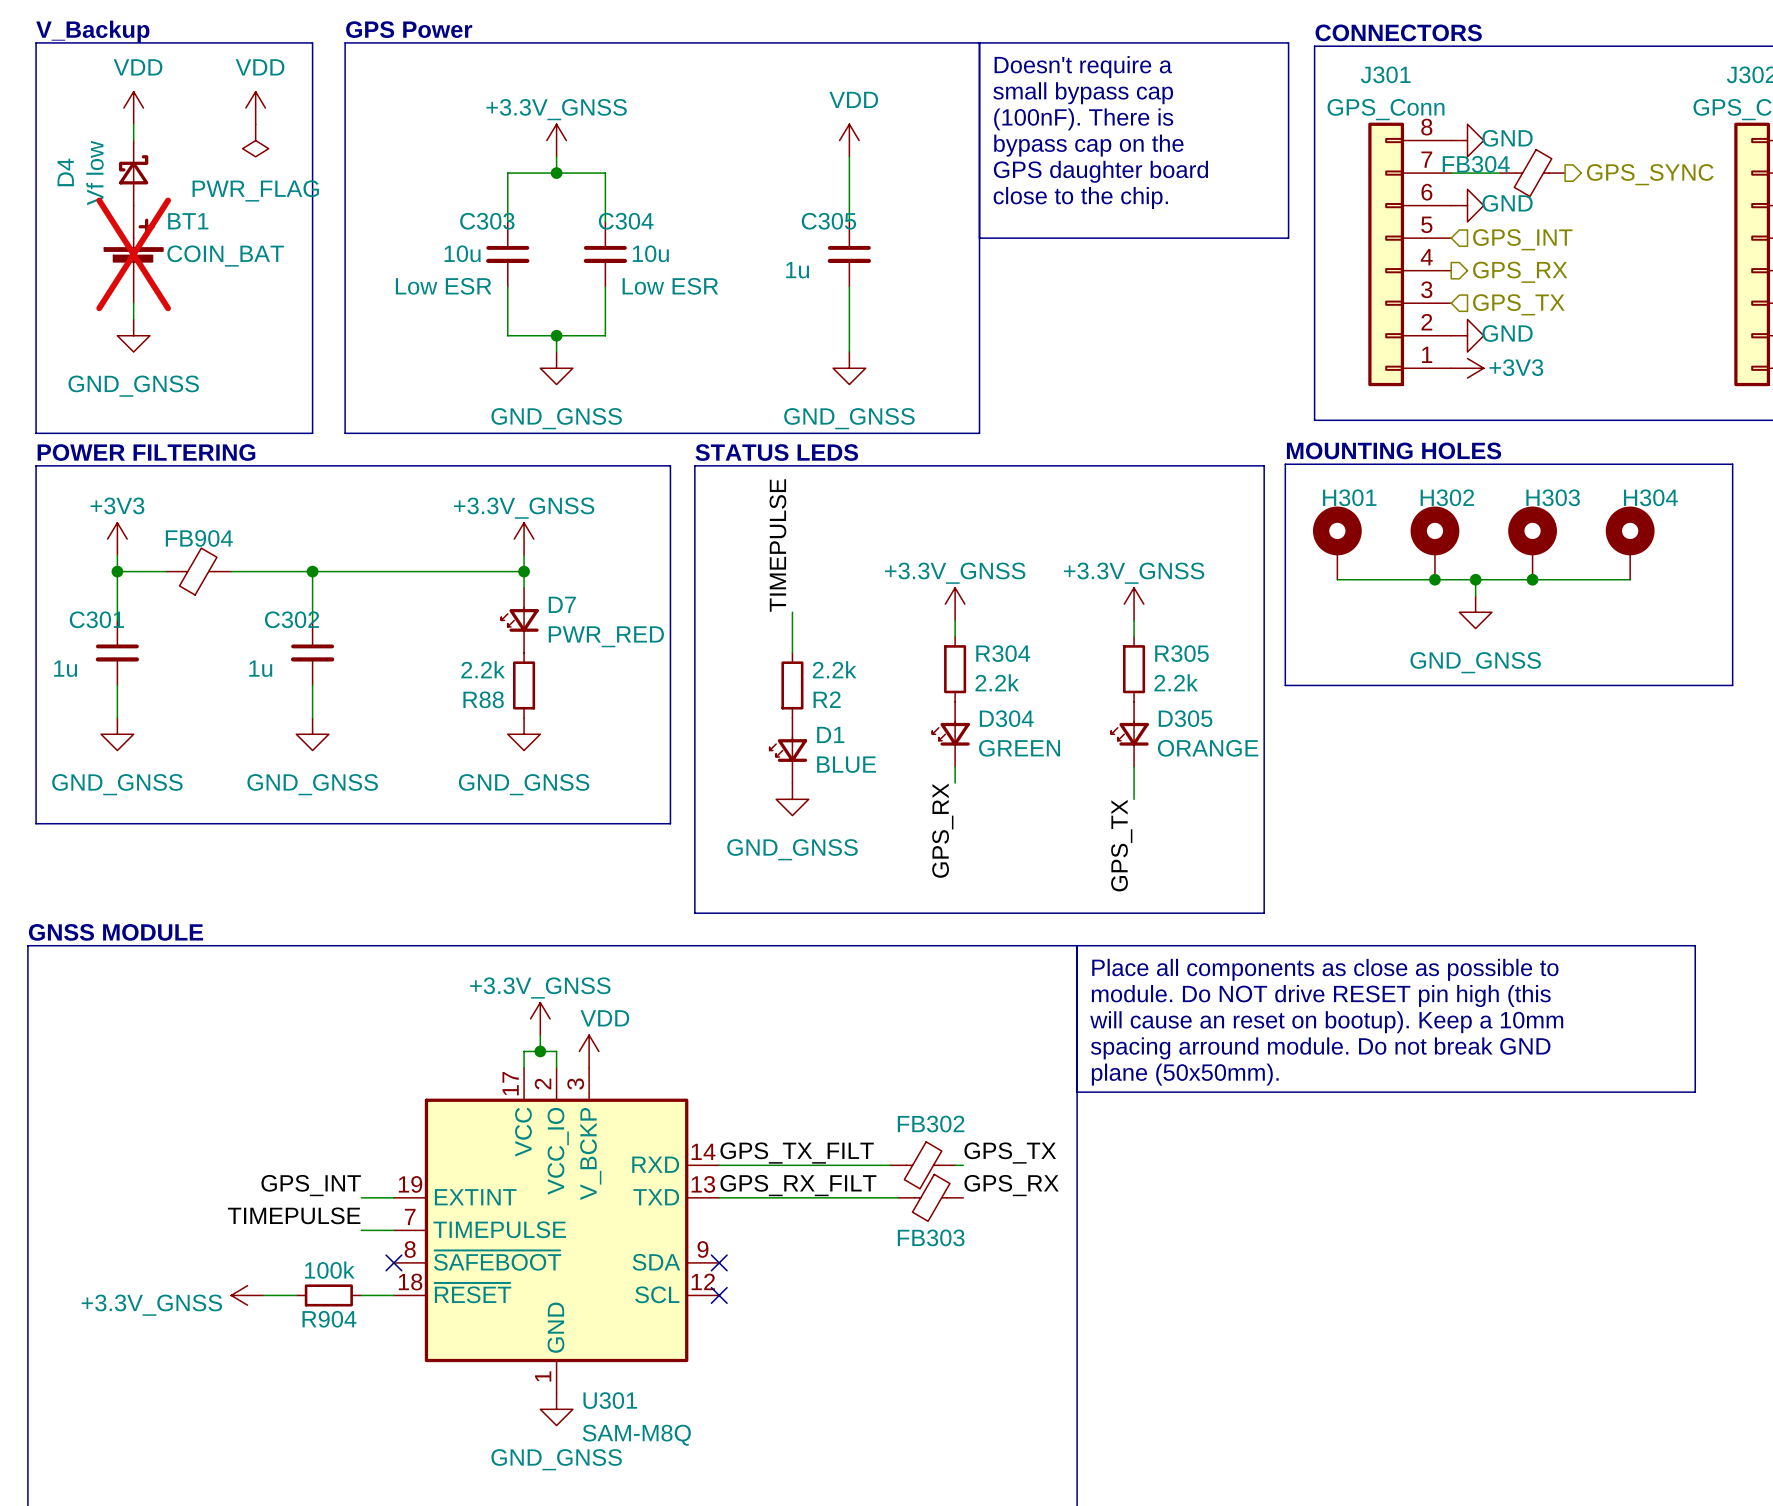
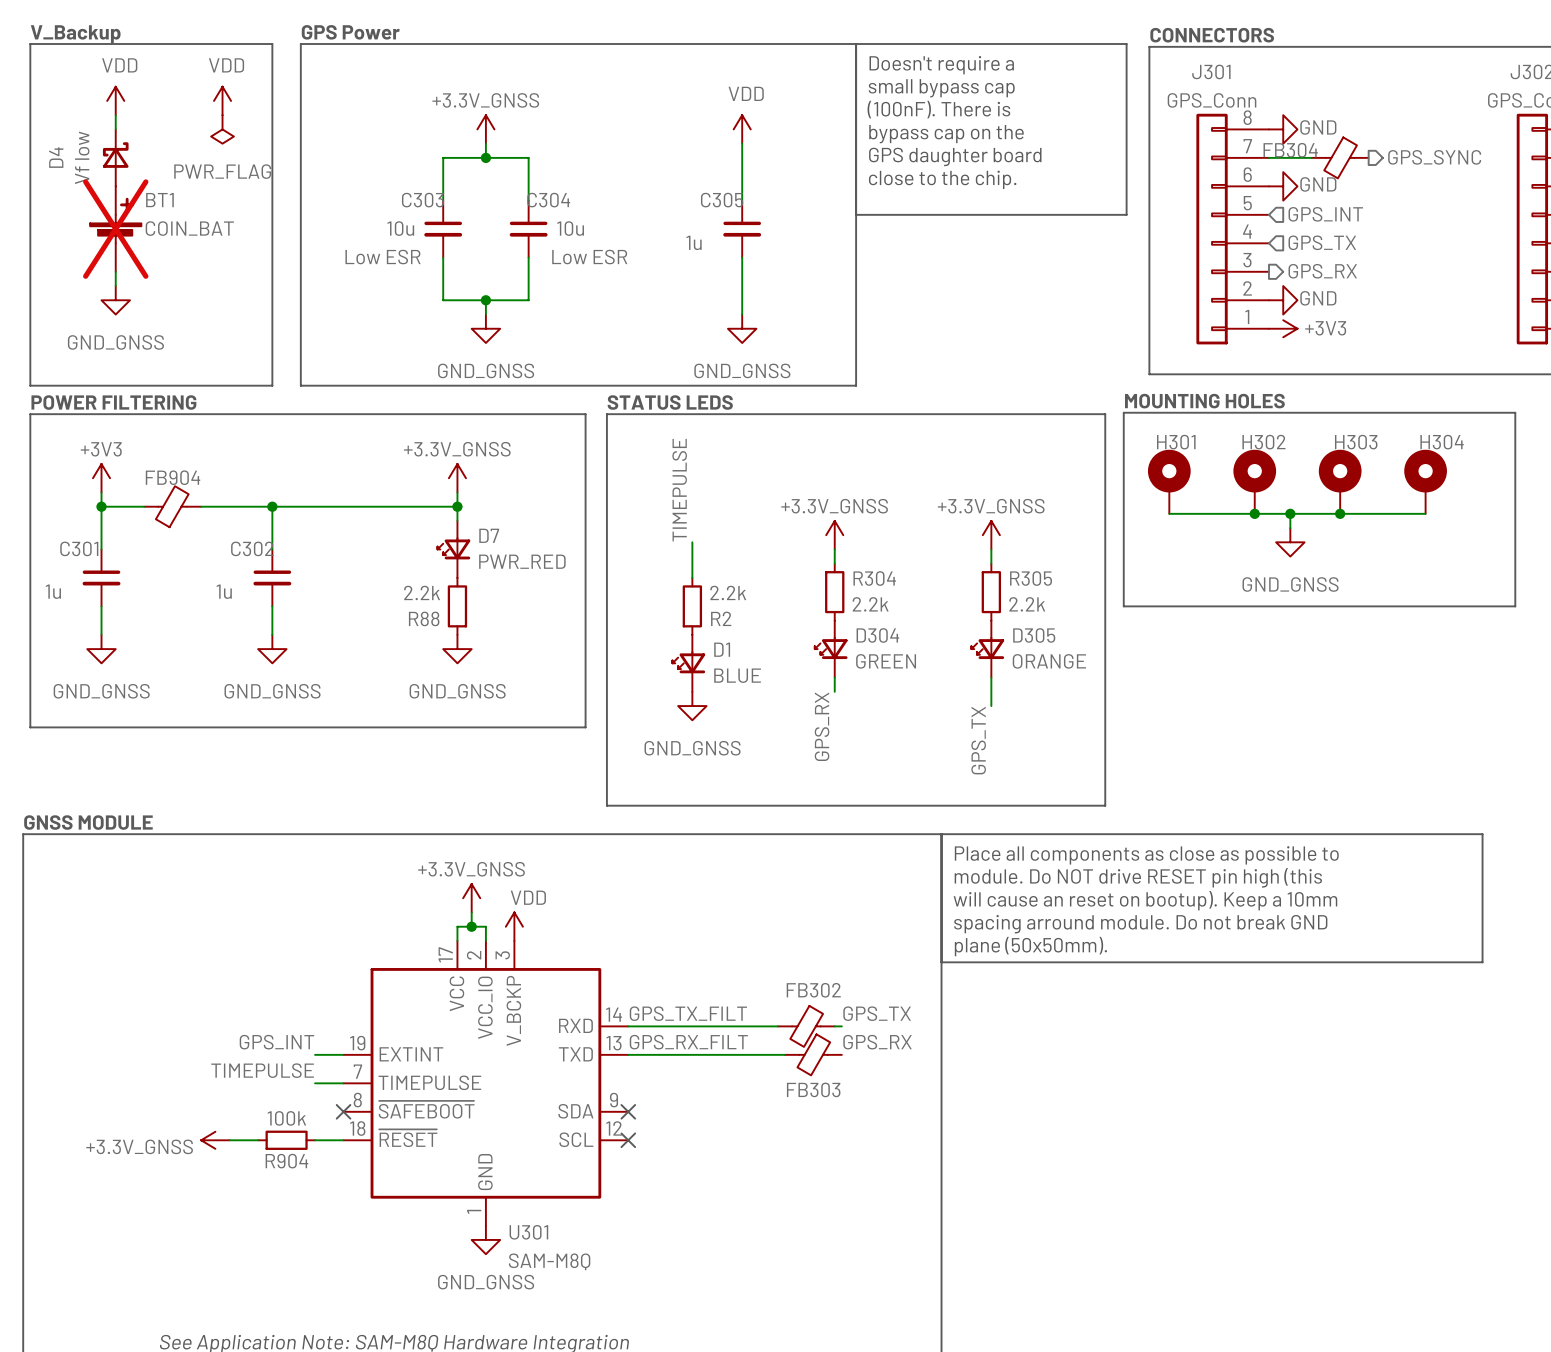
hierarchical label shape: output (1520, 272) -> input (1322, 242)
hierarchical label: GPS_RX (1520, 272) -> GPS_TX (1322, 242)
hierarchical label shape: input (1518, 304) -> output (1322, 271)
hierarchical label: GPS_TX (1518, 304) -> GPS_RX (1322, 271)

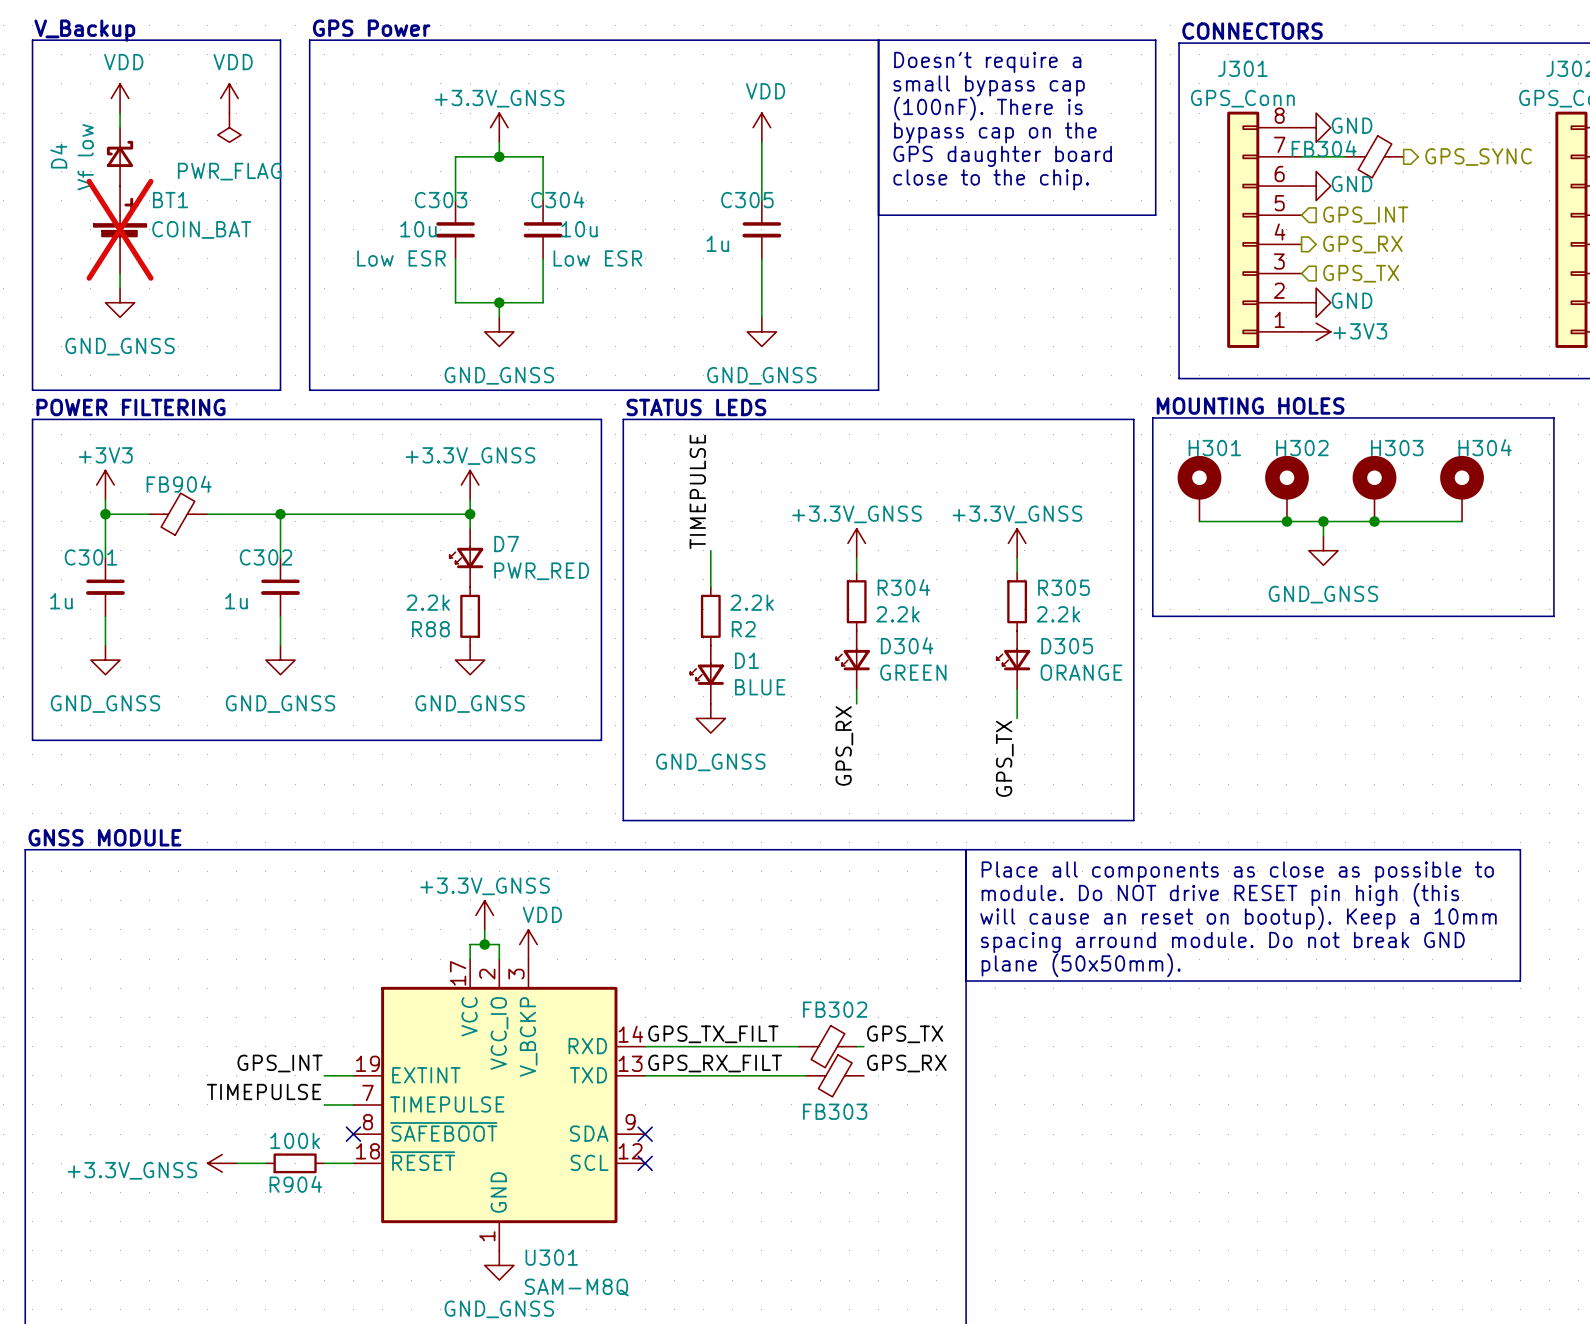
hierarchical label shape: input (1322, 242) -> output (1362, 244)
hierarchical label: GPS_TX (1322, 242) -> GPS_RX (1362, 244)
hierarchical label shape: output (1322, 271) -> input (1361, 273)
hierarchical label: GPS_RX (1322, 271) -> GPS_TX (1361, 273)

